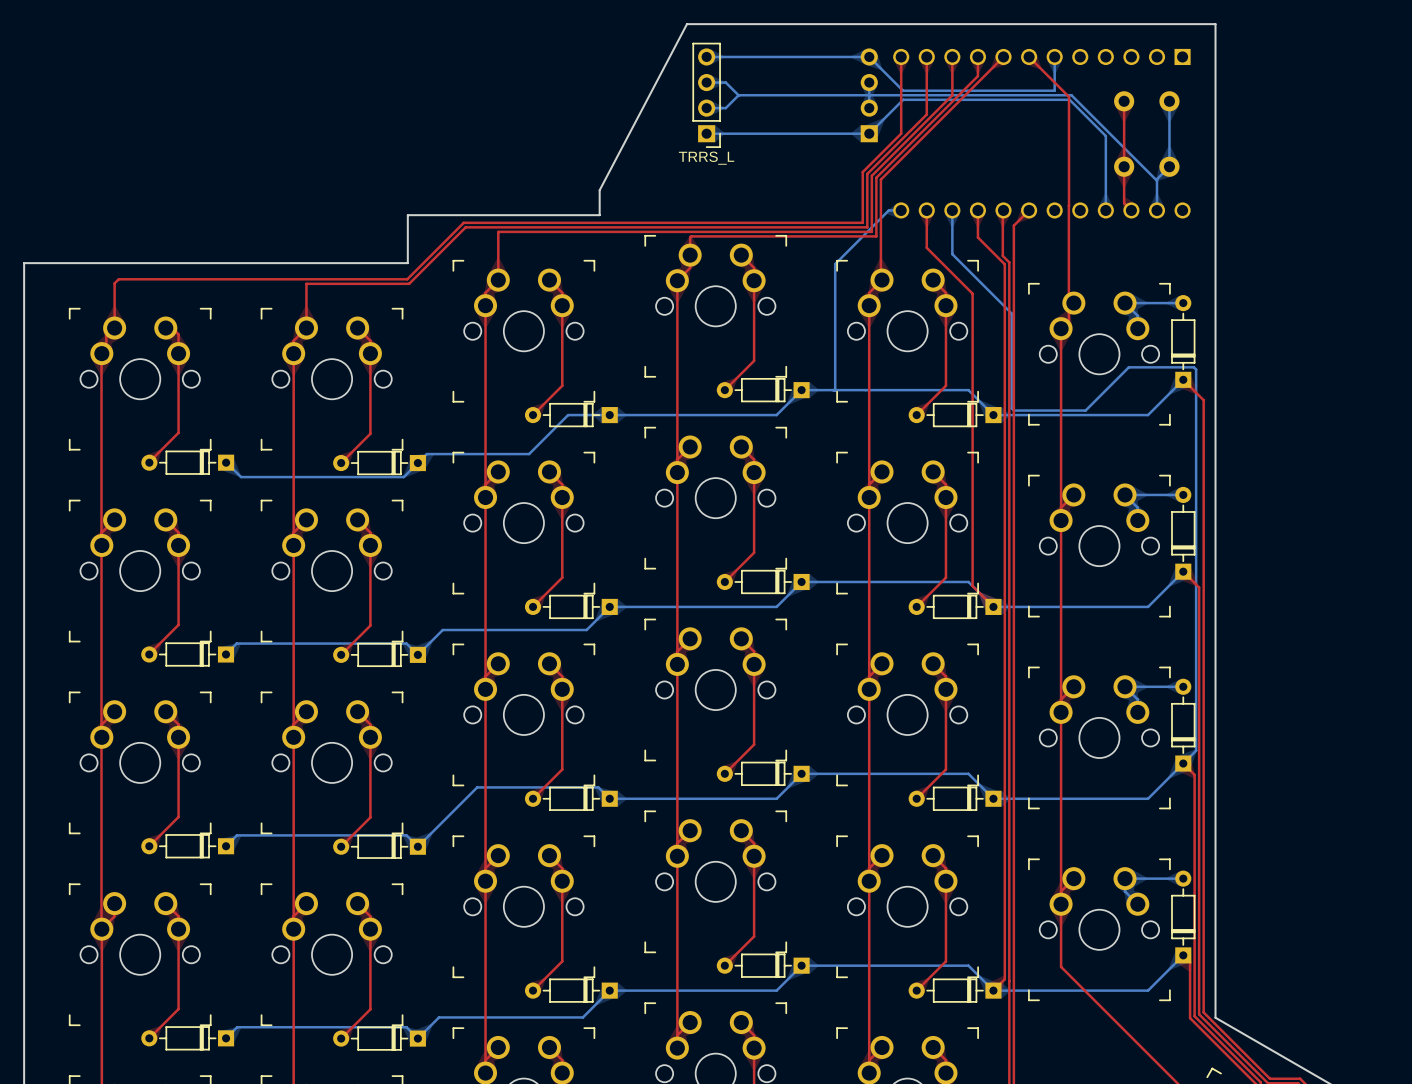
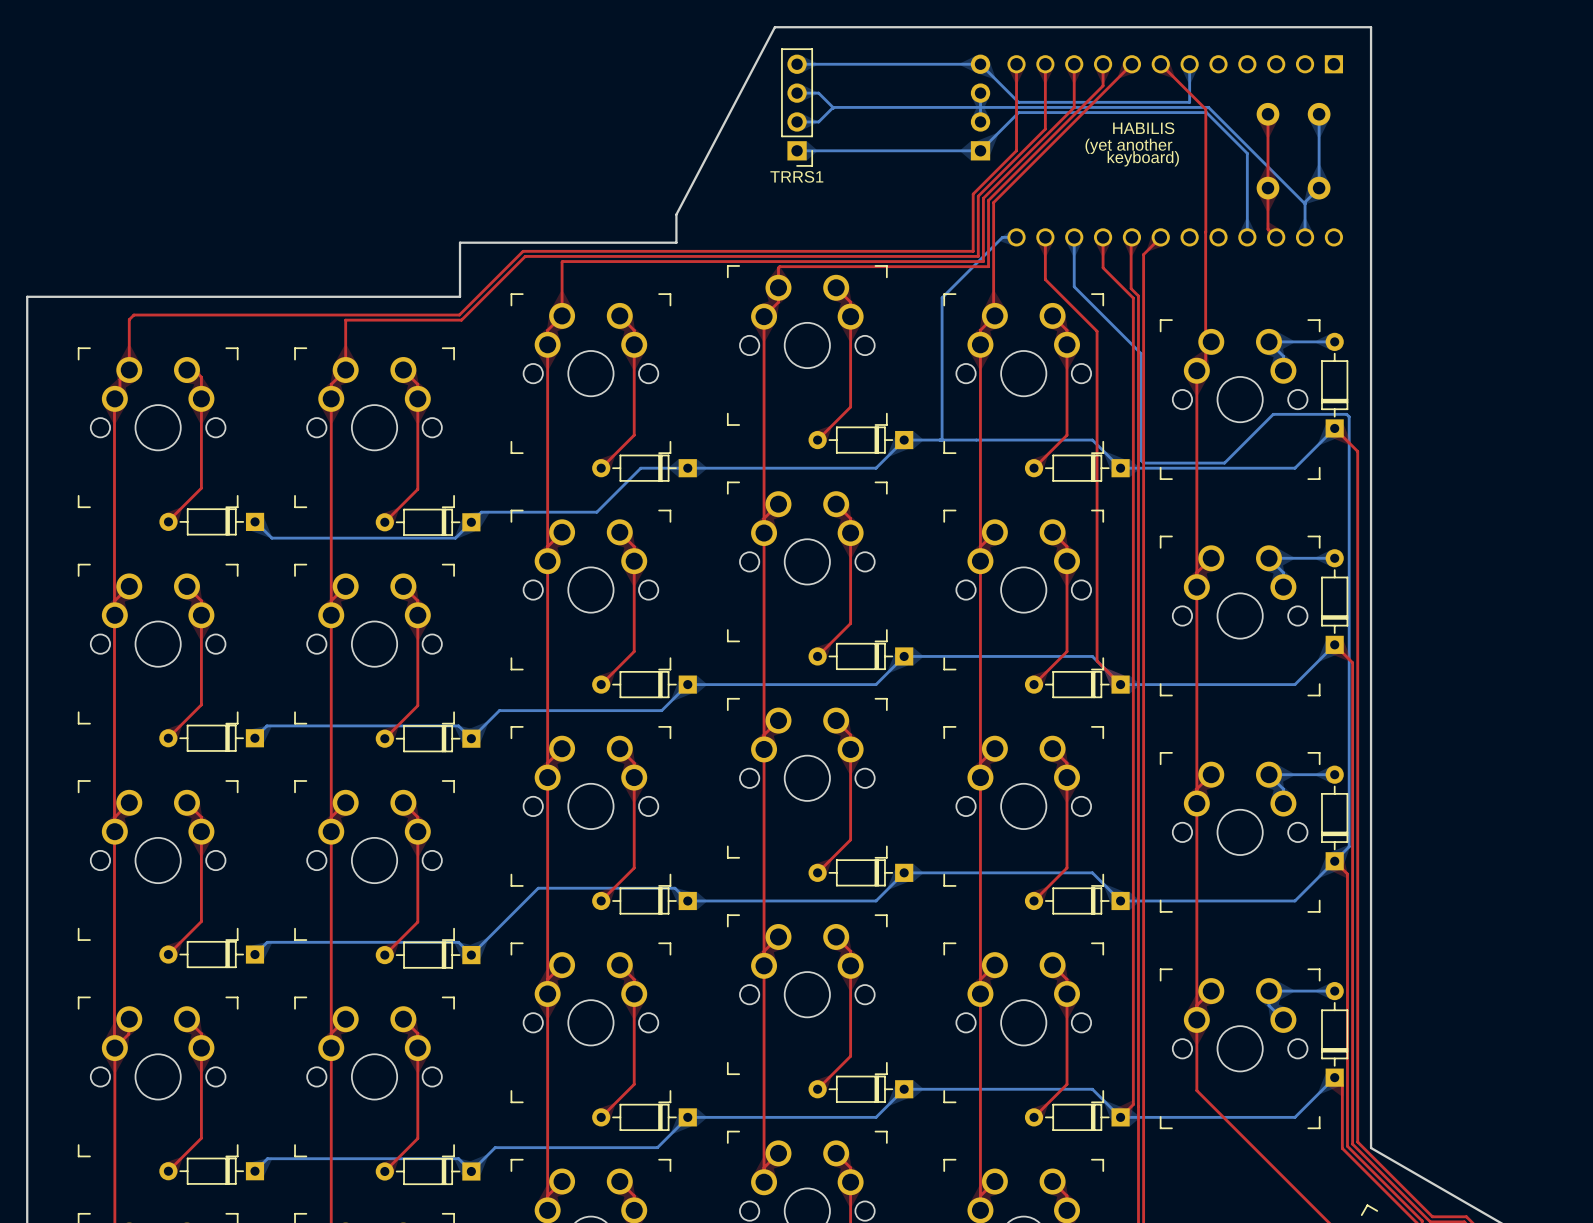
text: none -> HABILIS (1143, 128)
text: none -> (yet another (1128, 146)
text: none -> keyboard) (1143, 158)
TRRS_L name: TRRS_L (706, 158) -> TRRS1 (796, 176)

